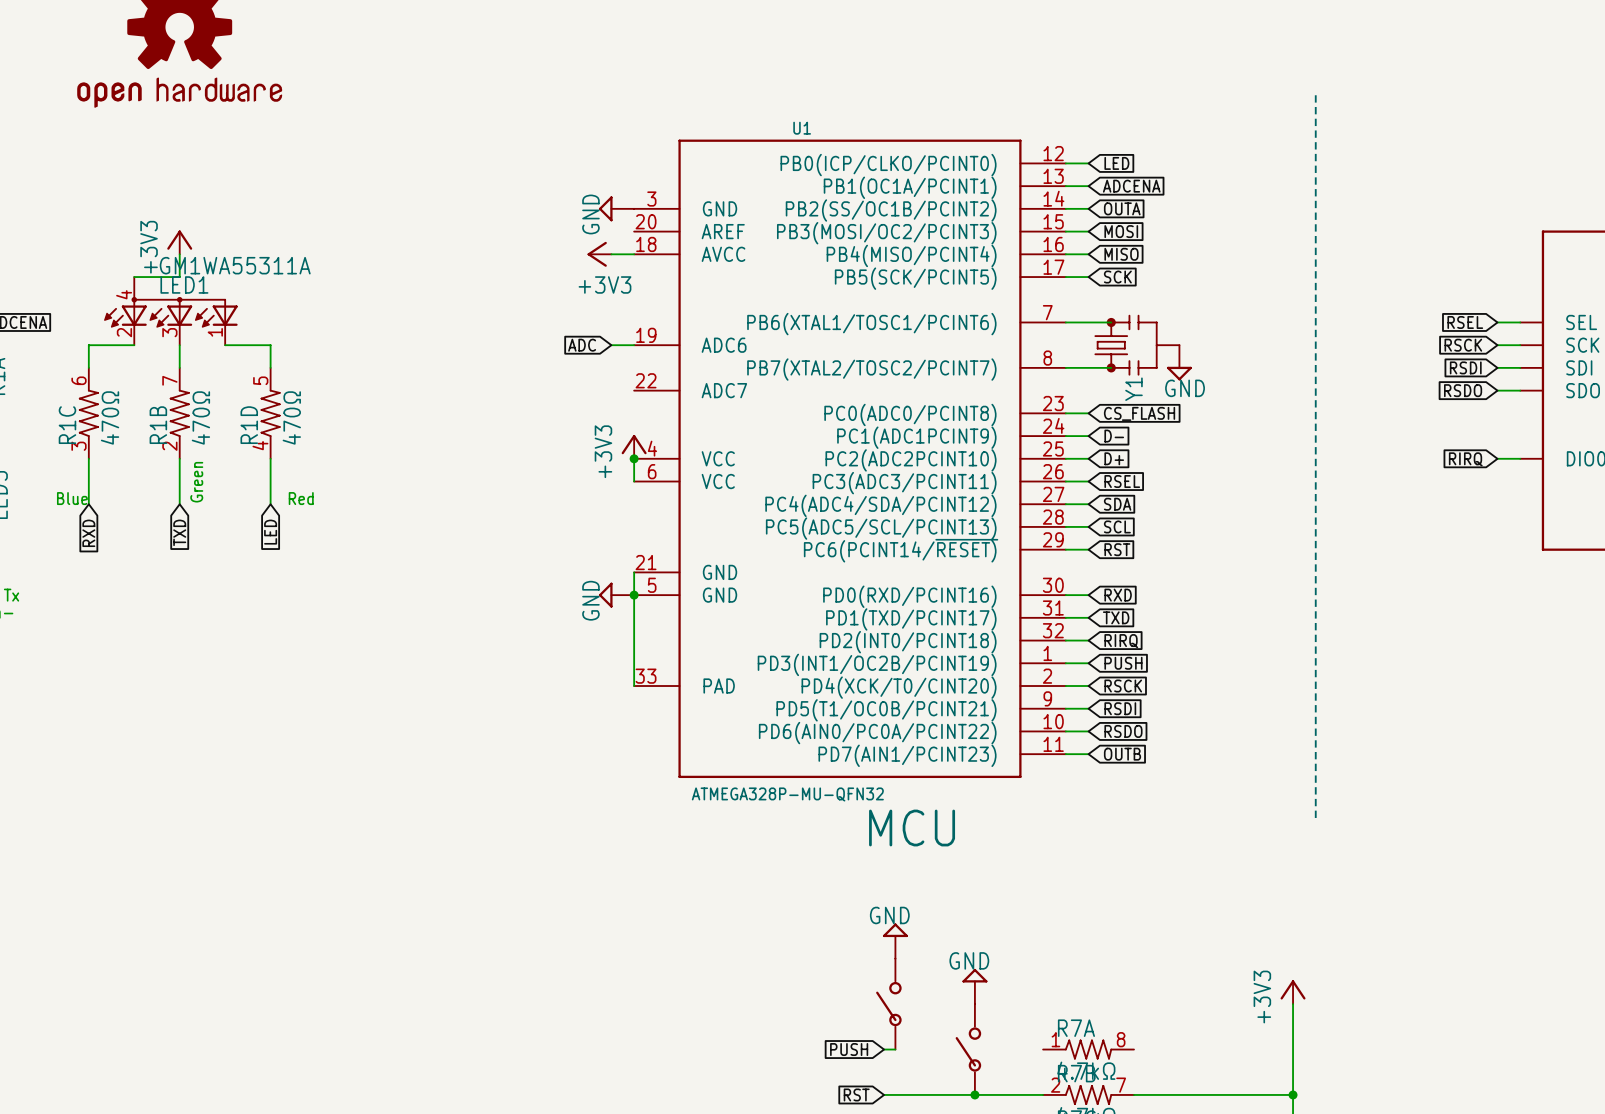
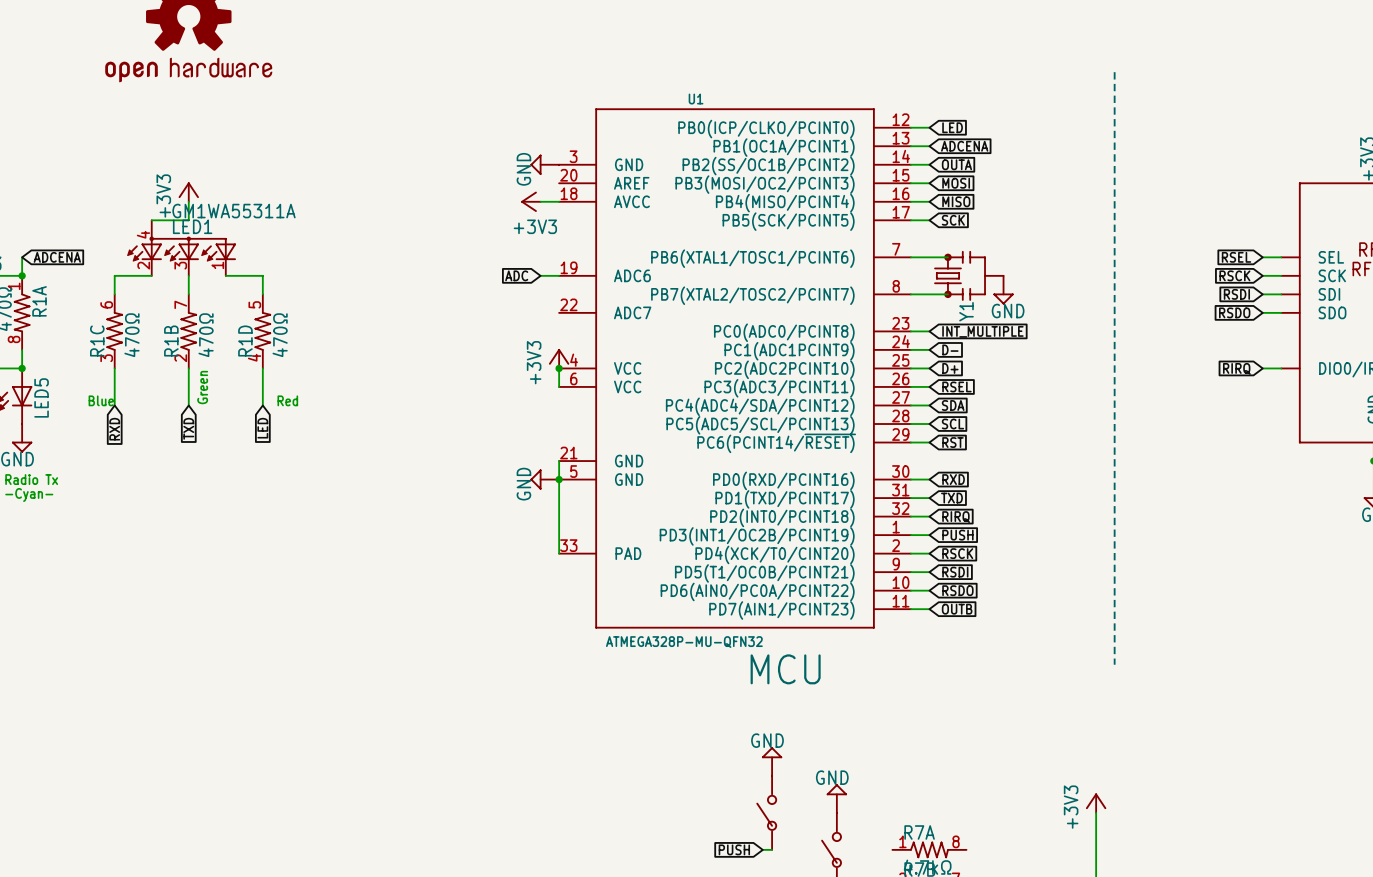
global label: CS_FLASH (1139, 413) -> INT_MULTIPLE (982, 331)

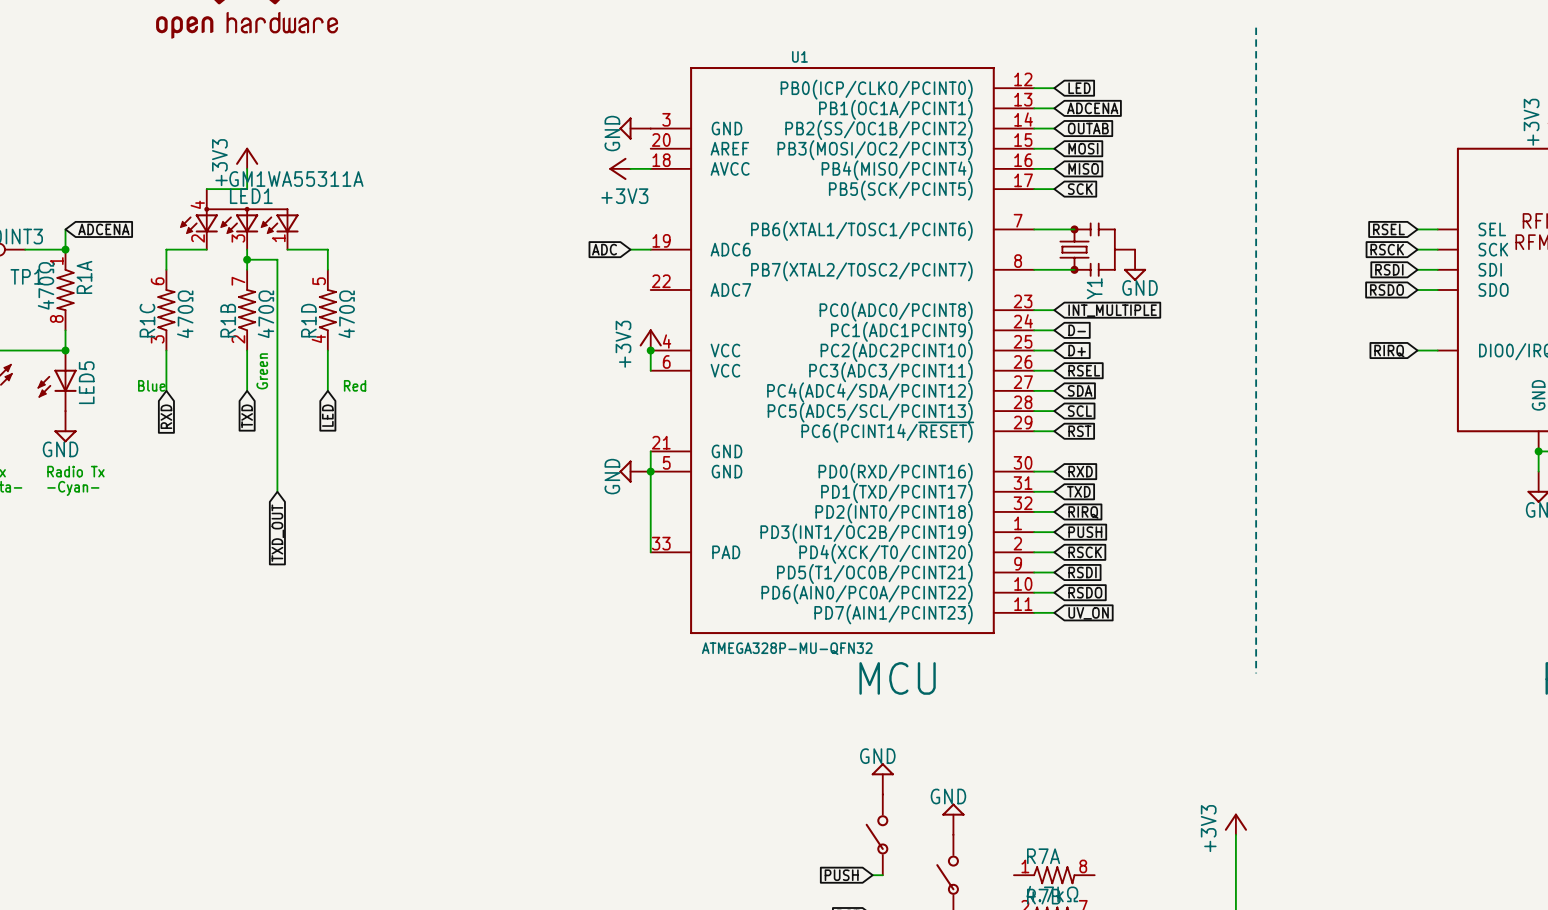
global label: OUTA (956, 164) -> OUTAB (1088, 128)
wire: none -> (247, 259) (277, 259) (277, 491)
junction: none -> (247, 259)
global label: none -> TXD_OUT (277, 533)
global label: OUTB (957, 609) -> UV_ON (1088, 613)

